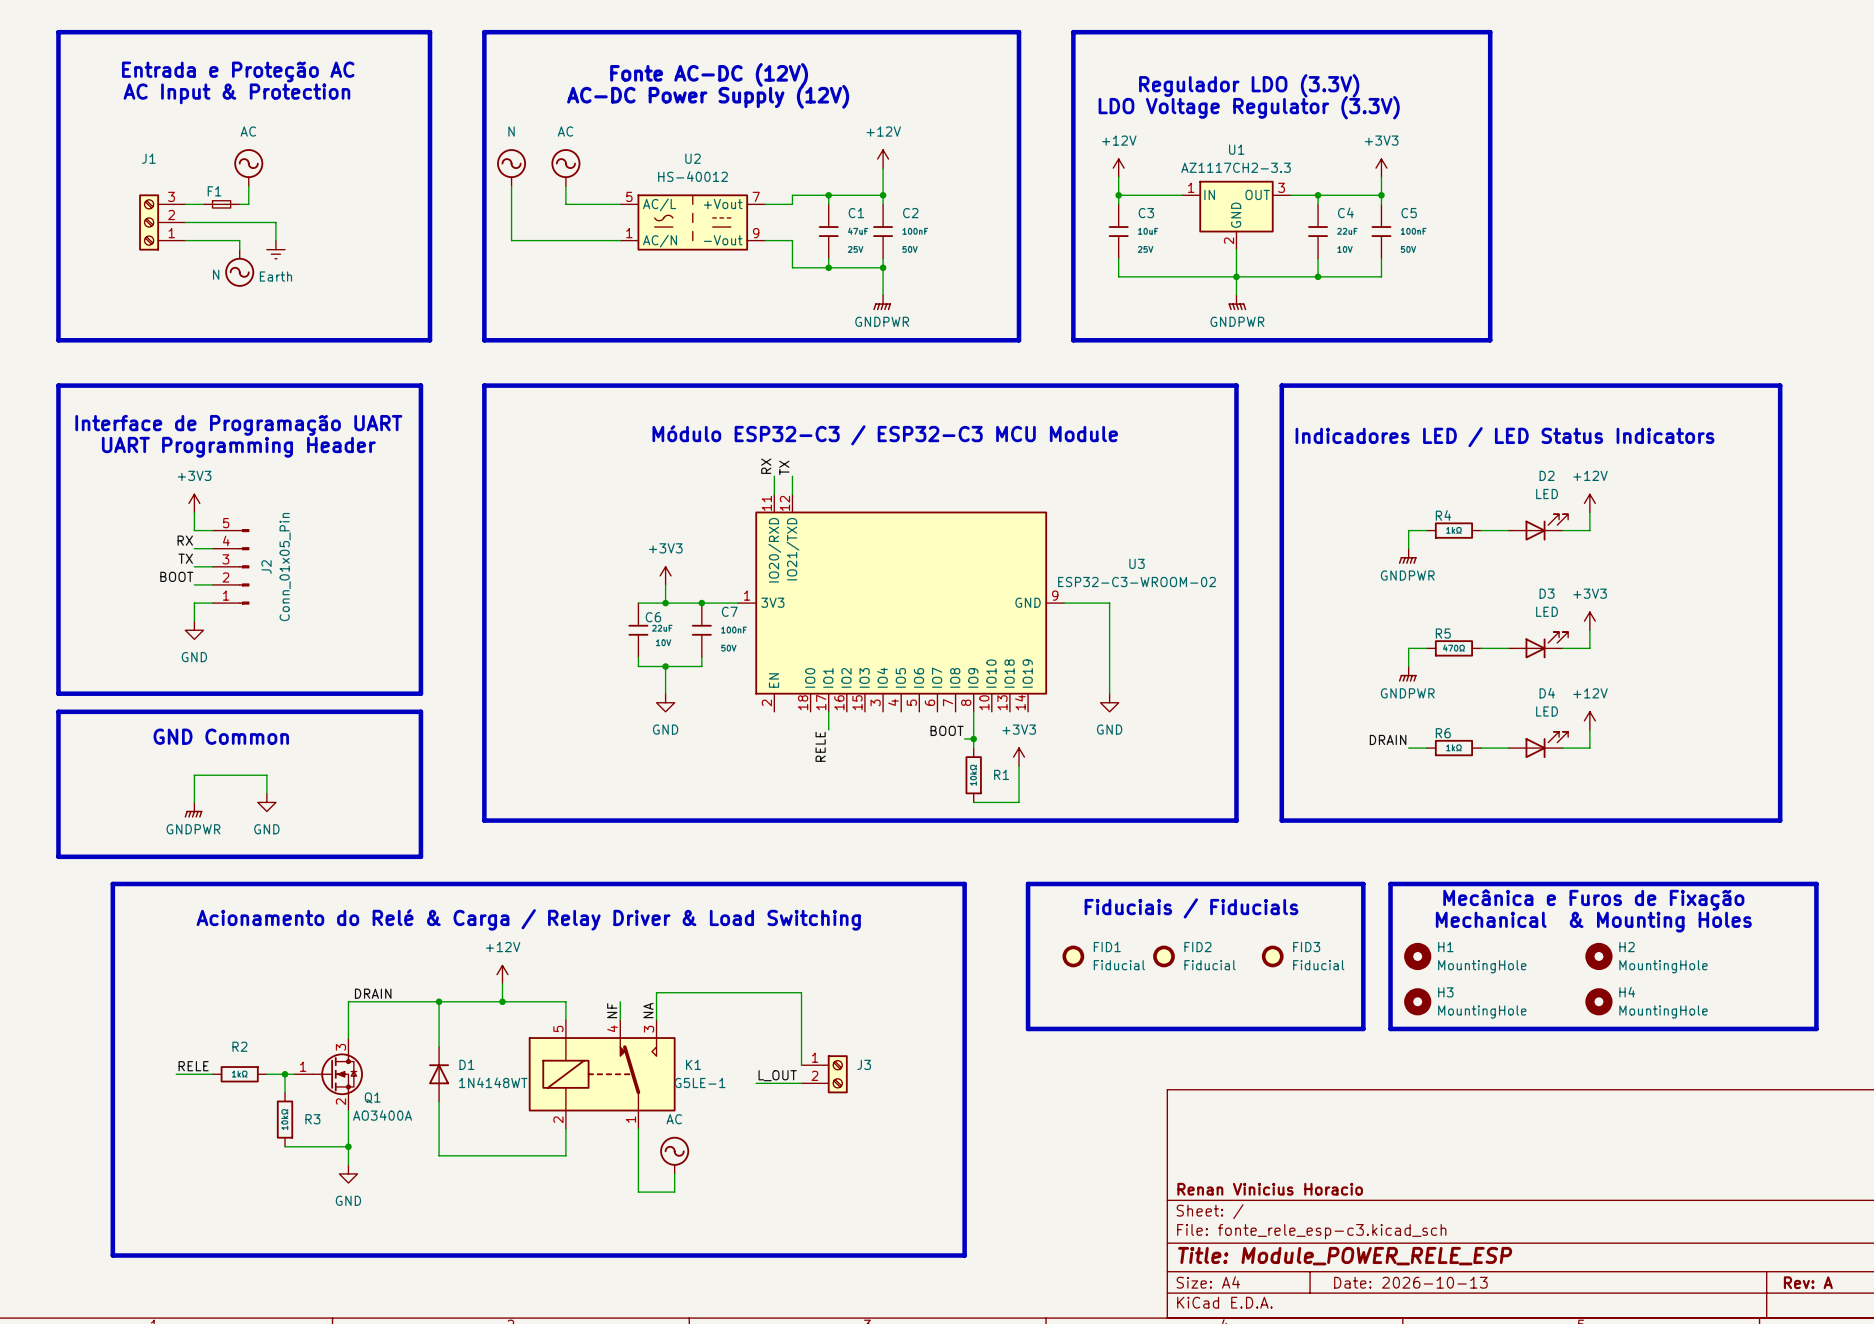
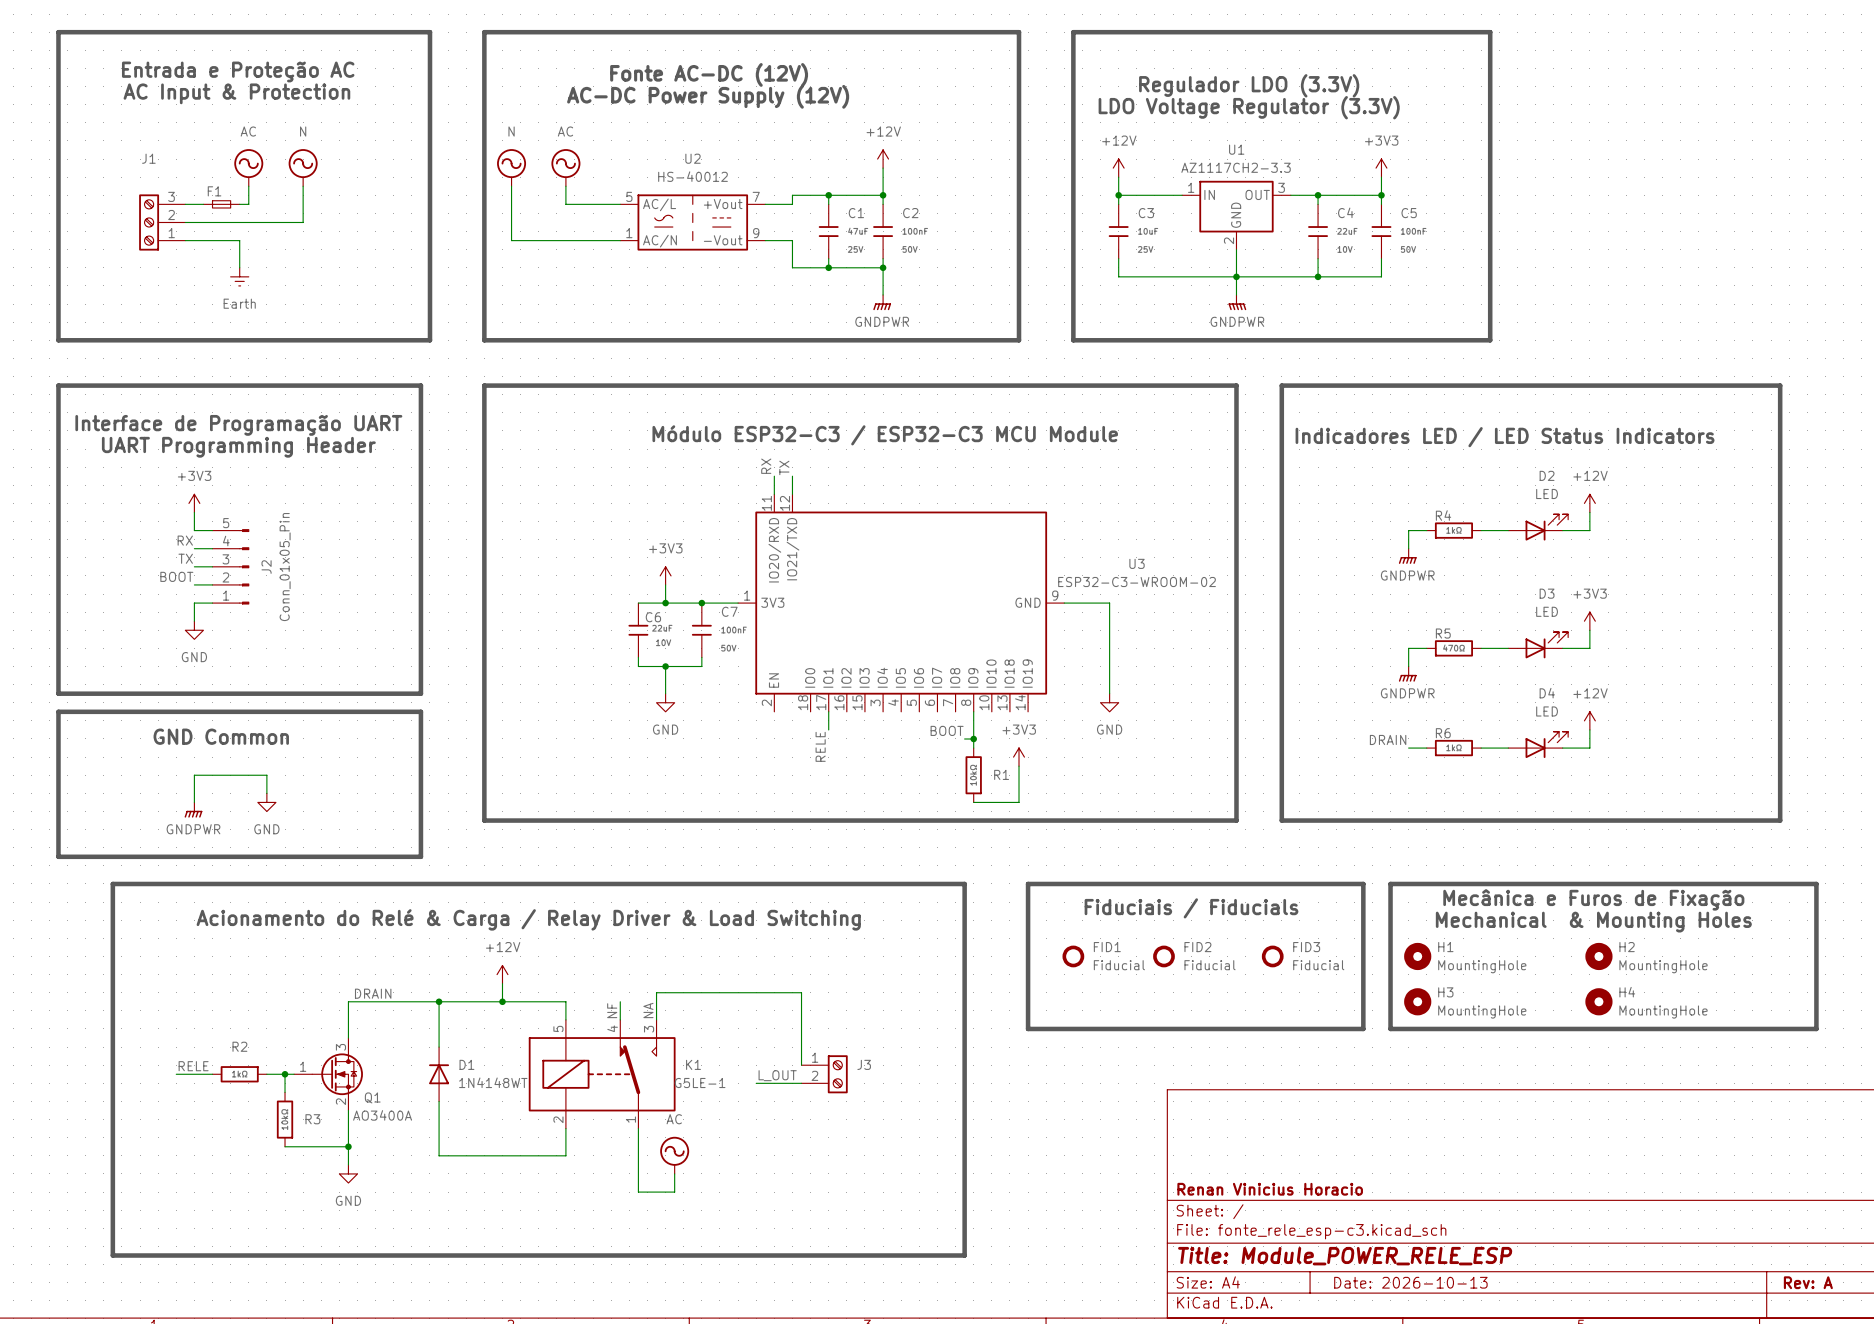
wire: (275, 222) (275, 240) -> (275, 222) (303, 222) (303, 186)
power symbol position: Earth (275, 249) -> Earth (239, 276)
power symbol rotation: 0° (239, 268) -> 180° (303, 167)
power symbol position: N (239, 268) -> N (303, 167)
power symbol text position: N (216, 274) -> N (303, 131)

